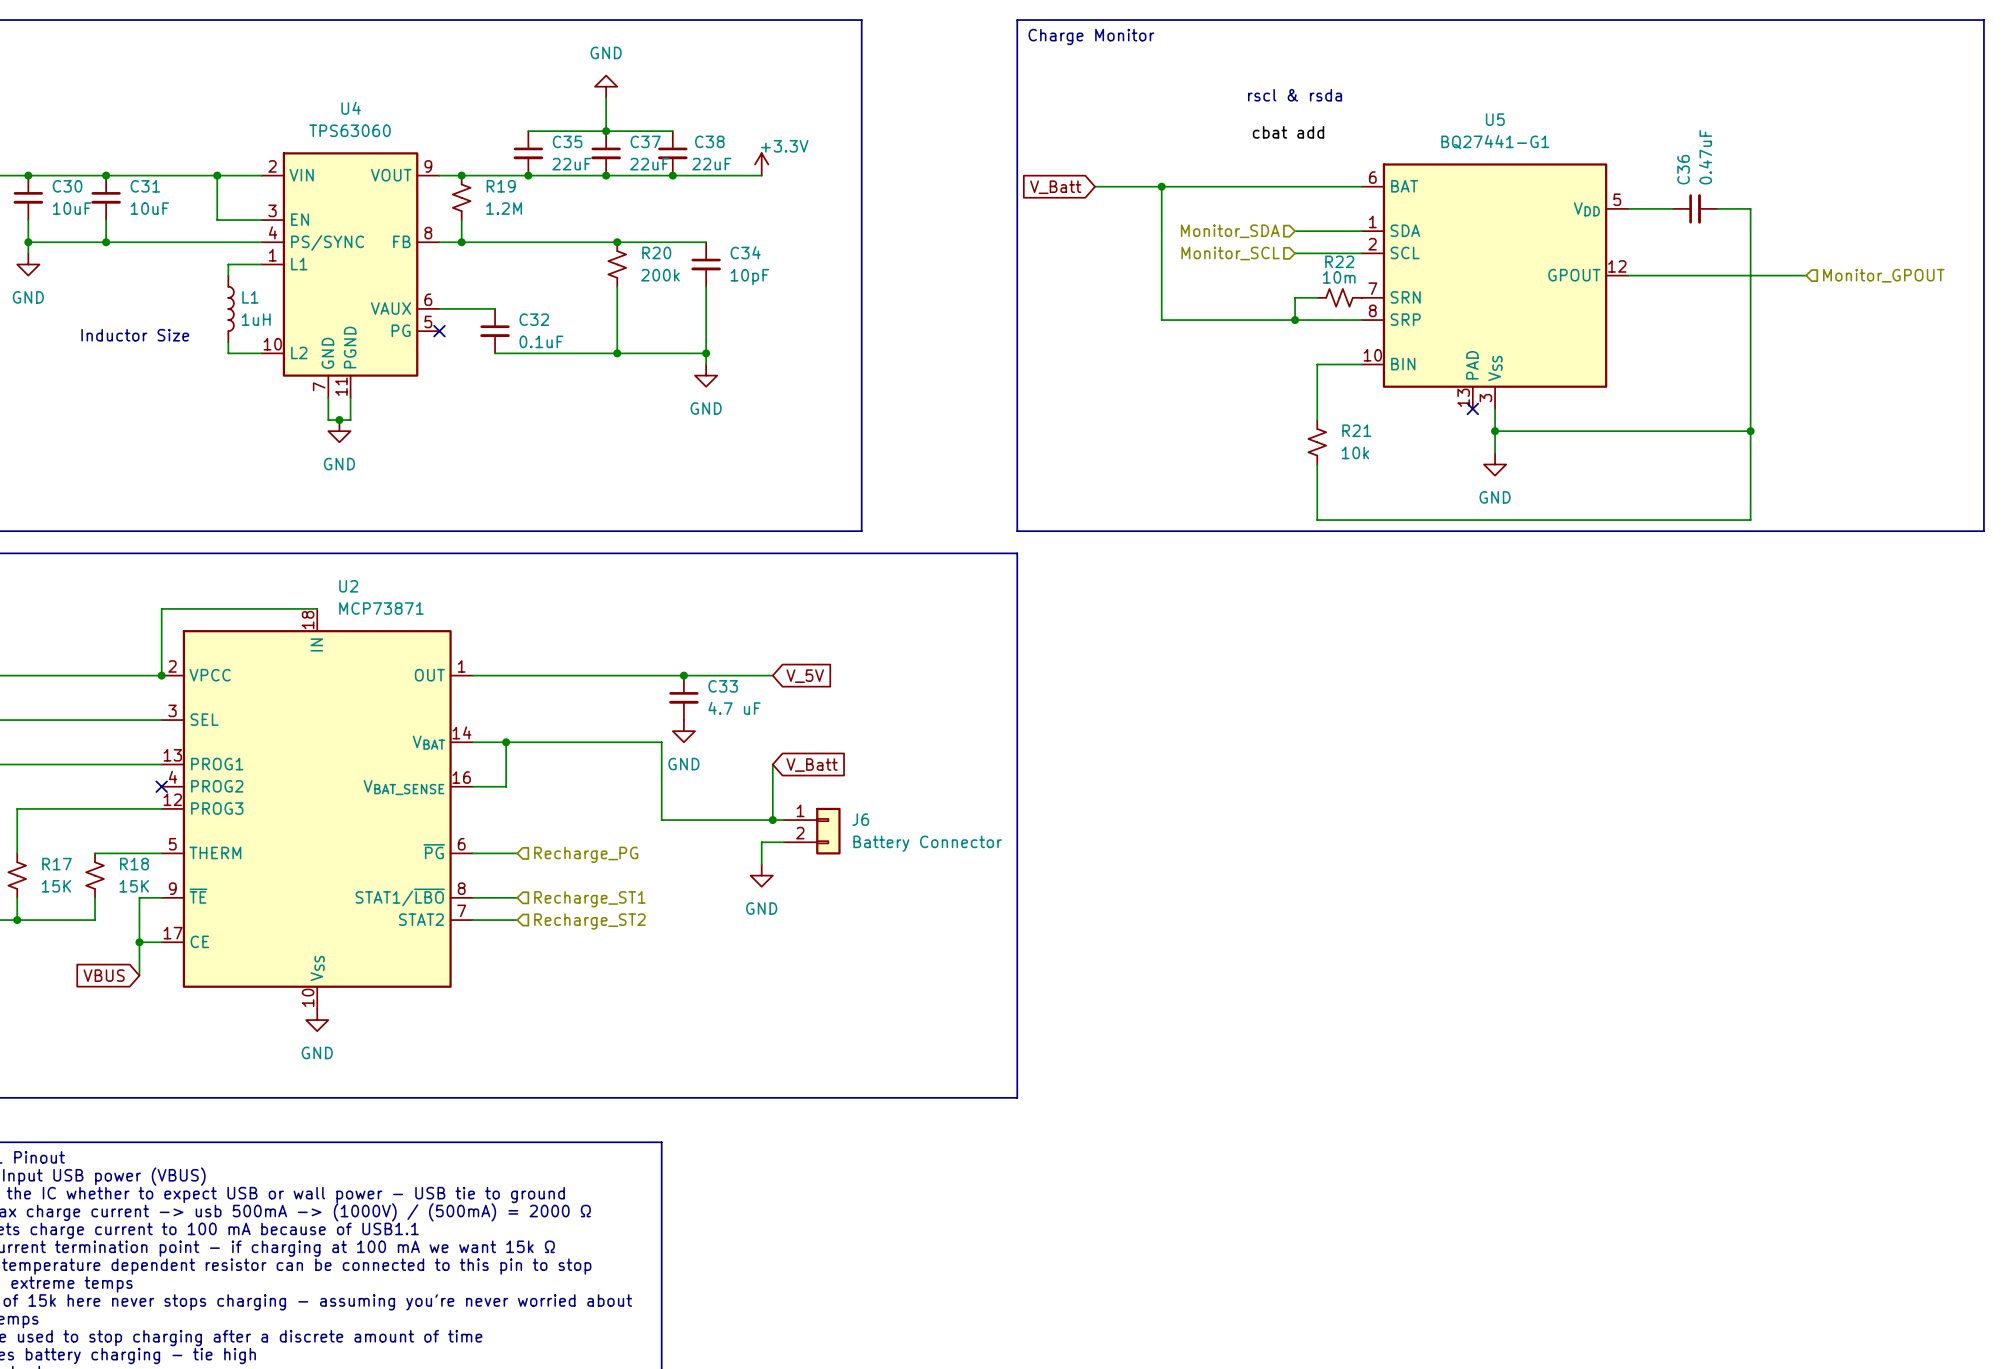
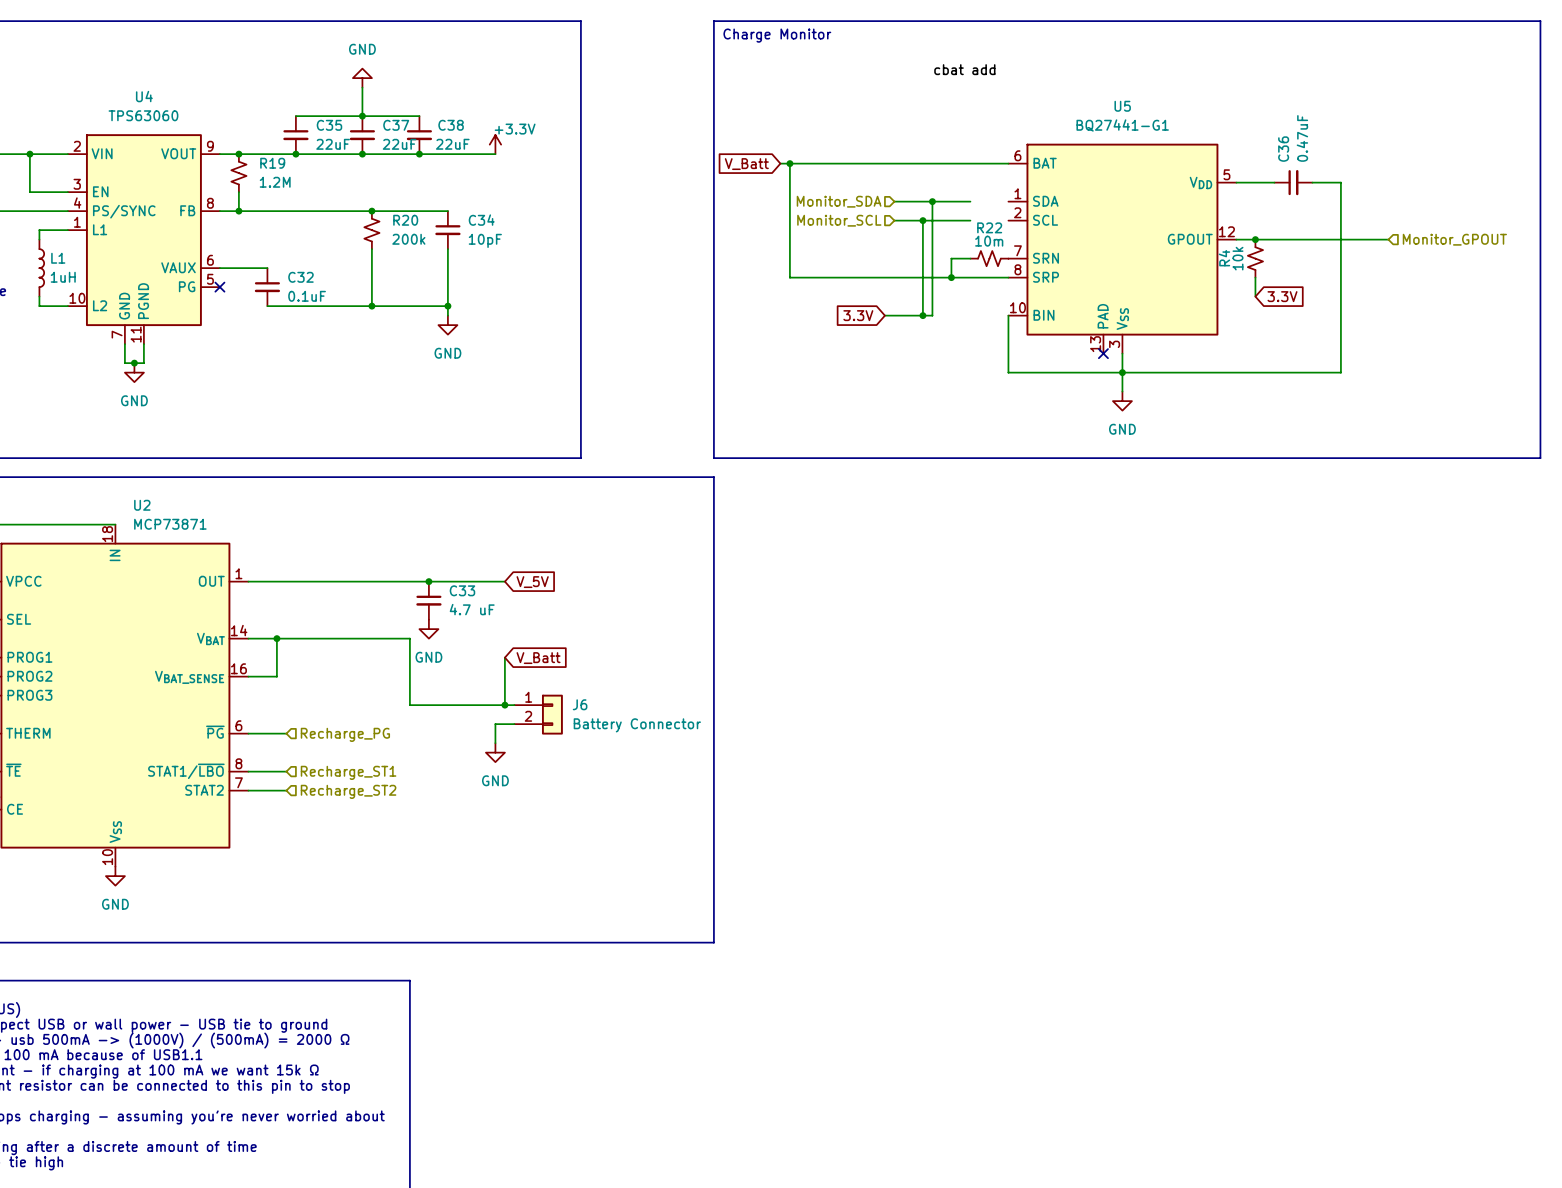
text: rscl & rsda (1295, 95) -> none
label position: cbat add (1288, 132) -> cbat add (964, 69)
junction: none -> (789, 163)
wire: (1161, 186) (1161, 320) -> (789, 163) (789, 277) (837, 277)
junction: (1161, 186) -> none
wire: none -> (894, 201) (951, 201)
hierarchical label position: Monitor_SDA (1230, 231) -> Monitor_SDA (839, 201)
wire: none -> (932, 201) (932, 315) (884, 315)
junction: none -> (932, 201)
wire: (1317, 231) (1361, 231) -> none
wire: none -> (894, 220) (951, 220)
hierarchical label position: Monitor_SCL (1230, 253) -> Monitor_SCL (839, 220)
wire: none -> (922, 220) (922, 315)
junction: none -> (922, 220)
wire: (1317, 253) (1361, 253) -> none
junction: none -> (1255, 239)
R4: none -> 10k (1255, 258)
wire: none -> (1255, 277) (1255, 296)
global label: none -> 3.3V (1282, 296)
global label: none -> 3.3V (858, 315)
junction: none -> (922, 315)
wire: (1361, 364) (1317, 364) (1317, 420) -> (1008, 315) (1008, 372) (1122, 372)
wire: (1750, 431) (1750, 520) (1317, 520) (1317, 464) -> none
junction: (1750, 431) -> none
R21: 10k (1317, 442) -> none

